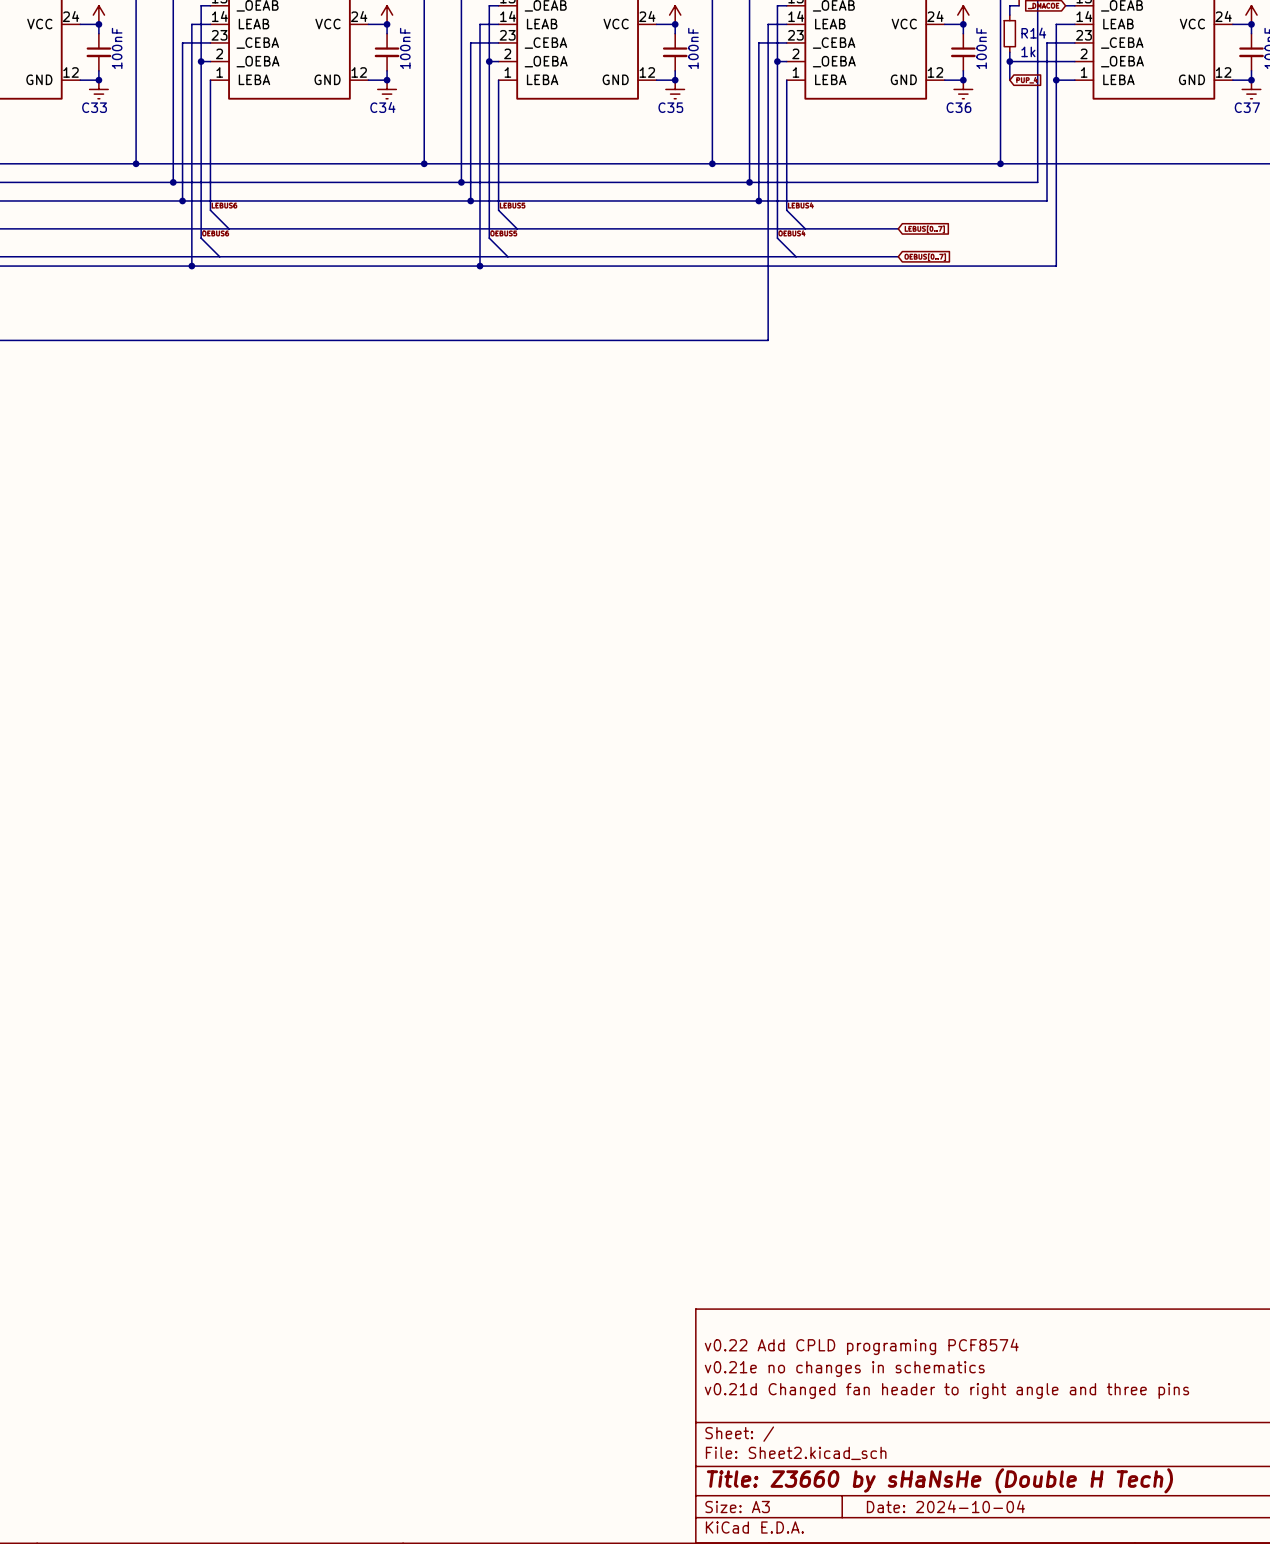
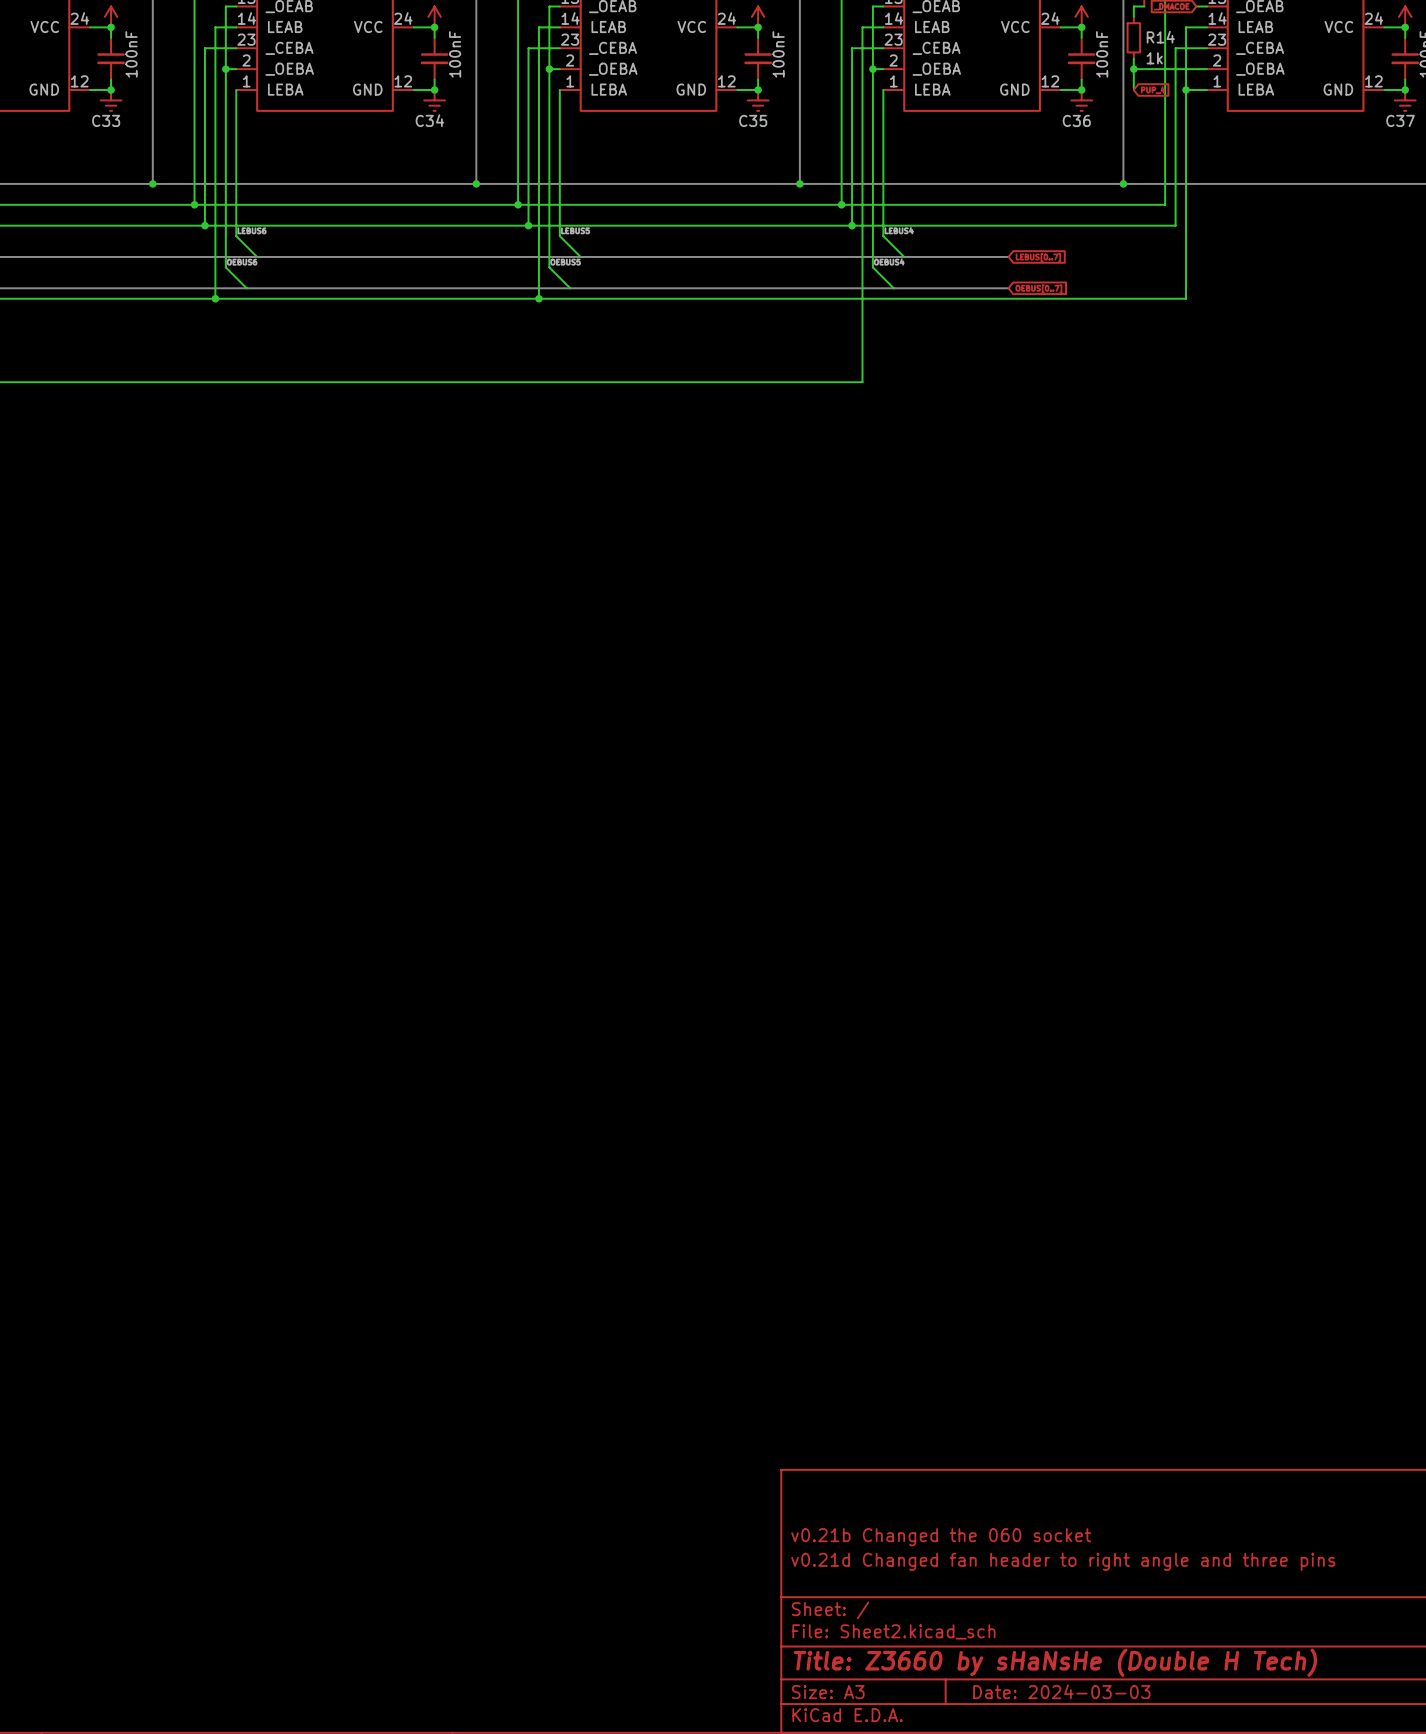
title block: v0.22 Add CPLD programing PCF8574 (861, 1346) -> none
title block: v0.21e no changes in schematics (844, 1369) -> v0.21b Changed the 060 socket (941, 1537)
title block: Date: 2024-10-04 (945, 1506) -> Date: 2024-03-03 (1061, 1691)

